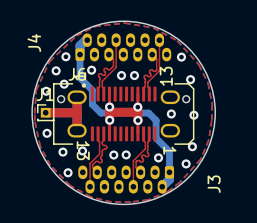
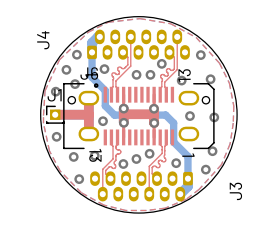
via: none -> (161, 63)
via: none -> (181, 80)
via: none -> (103, 121)
via: none -> (149, 153)
via: none -> (136, 159)
via: (126, 154) -> none
via: (113, 155) -> none
via: none -> (123, 164)

